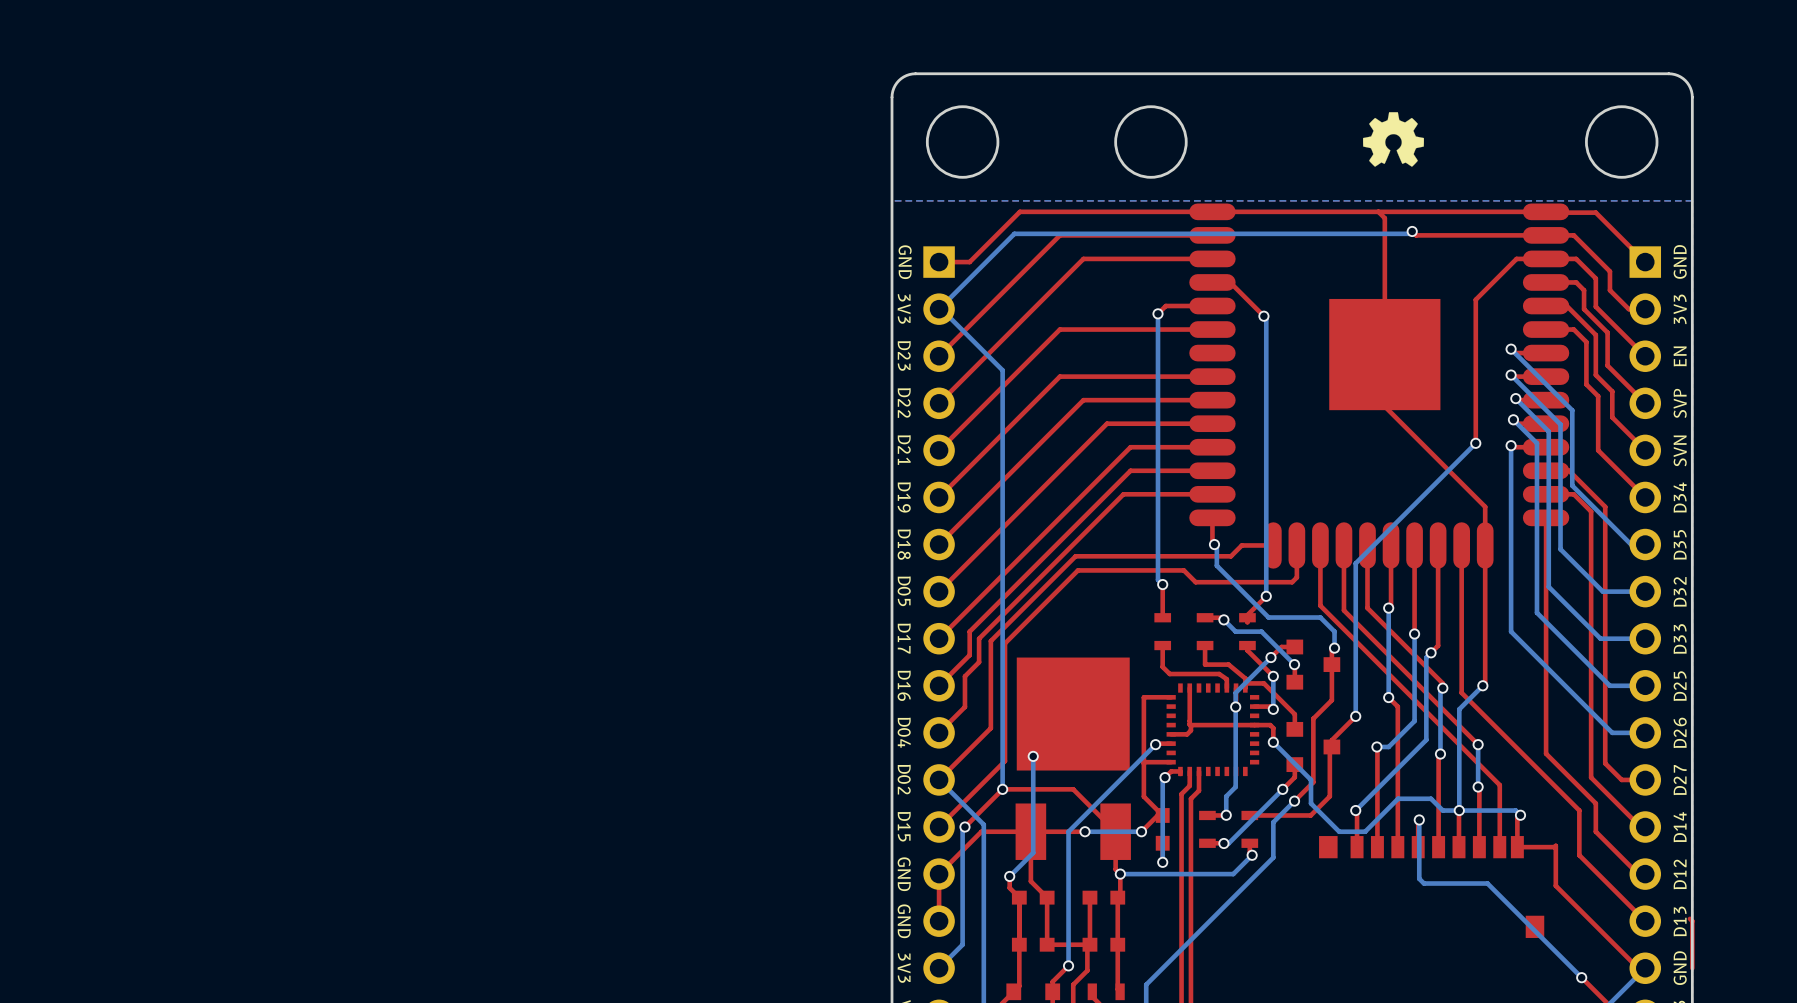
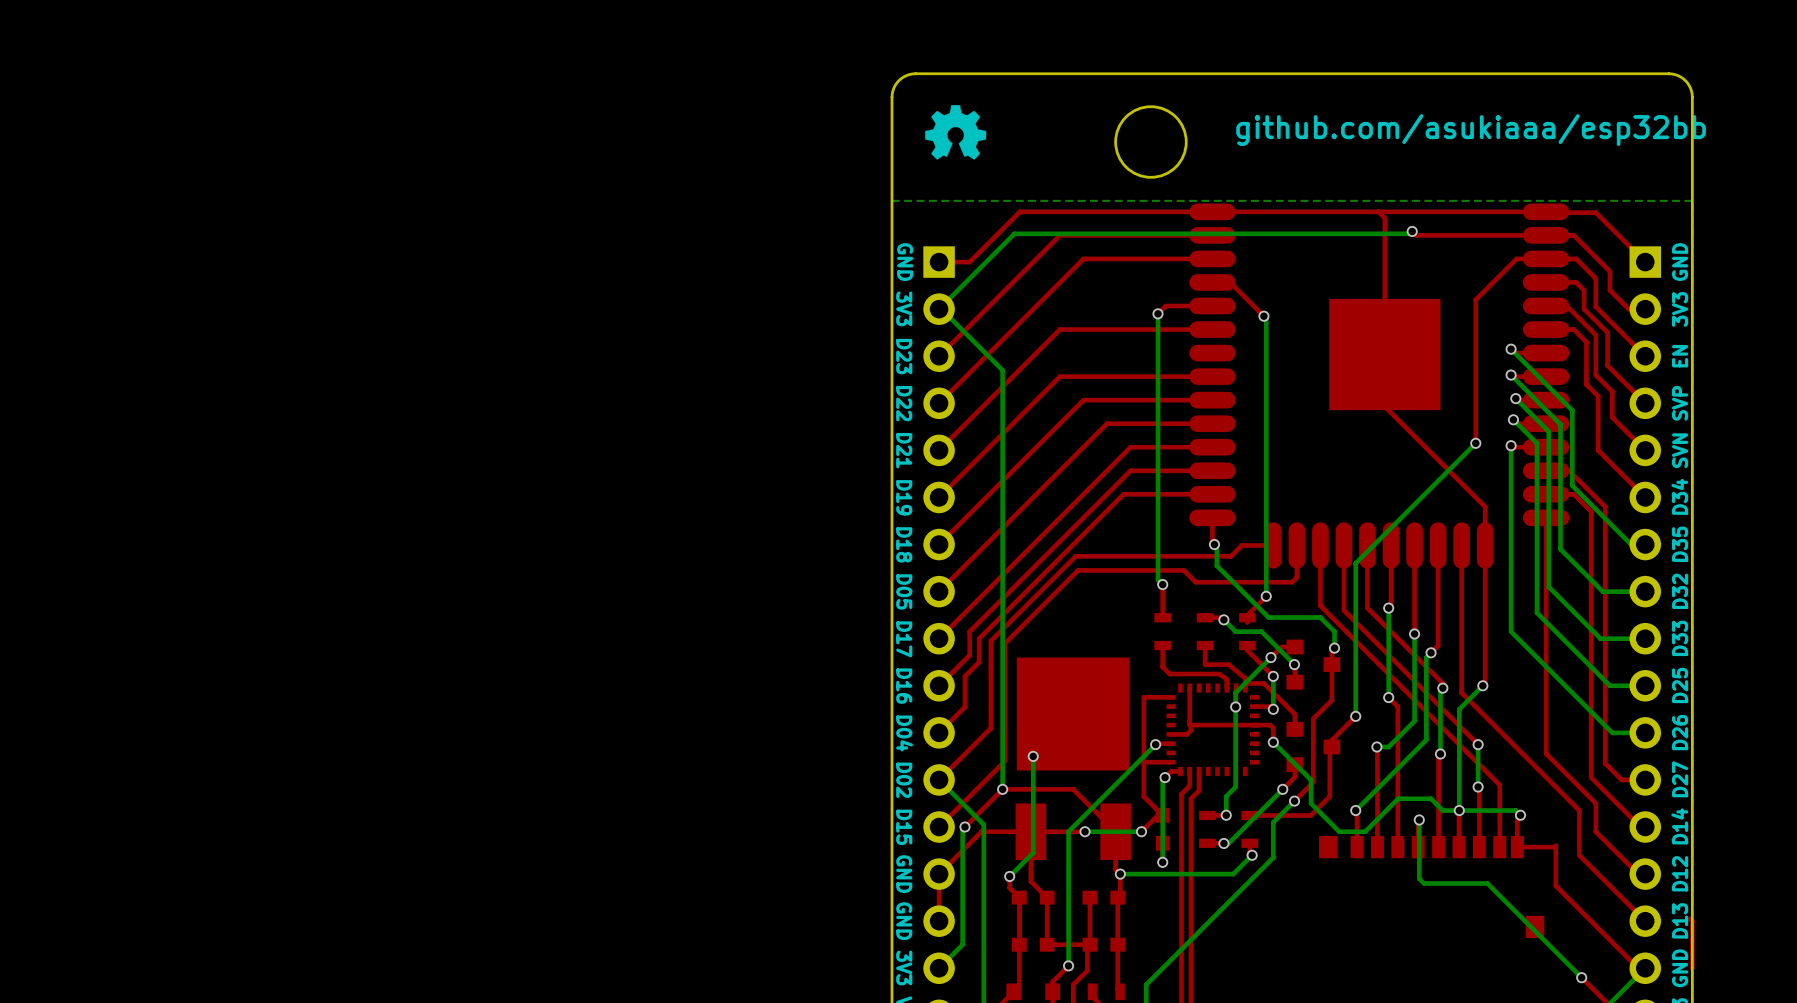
round board edge: [925, 105, 1000, 179] -> none
round board edge: [1585, 105, 1659, 179] -> none
text: none -> github.com/asukiaaa/esp32bb (1471, 130)
drawing position: (1393, 139) -> (955, 132)

